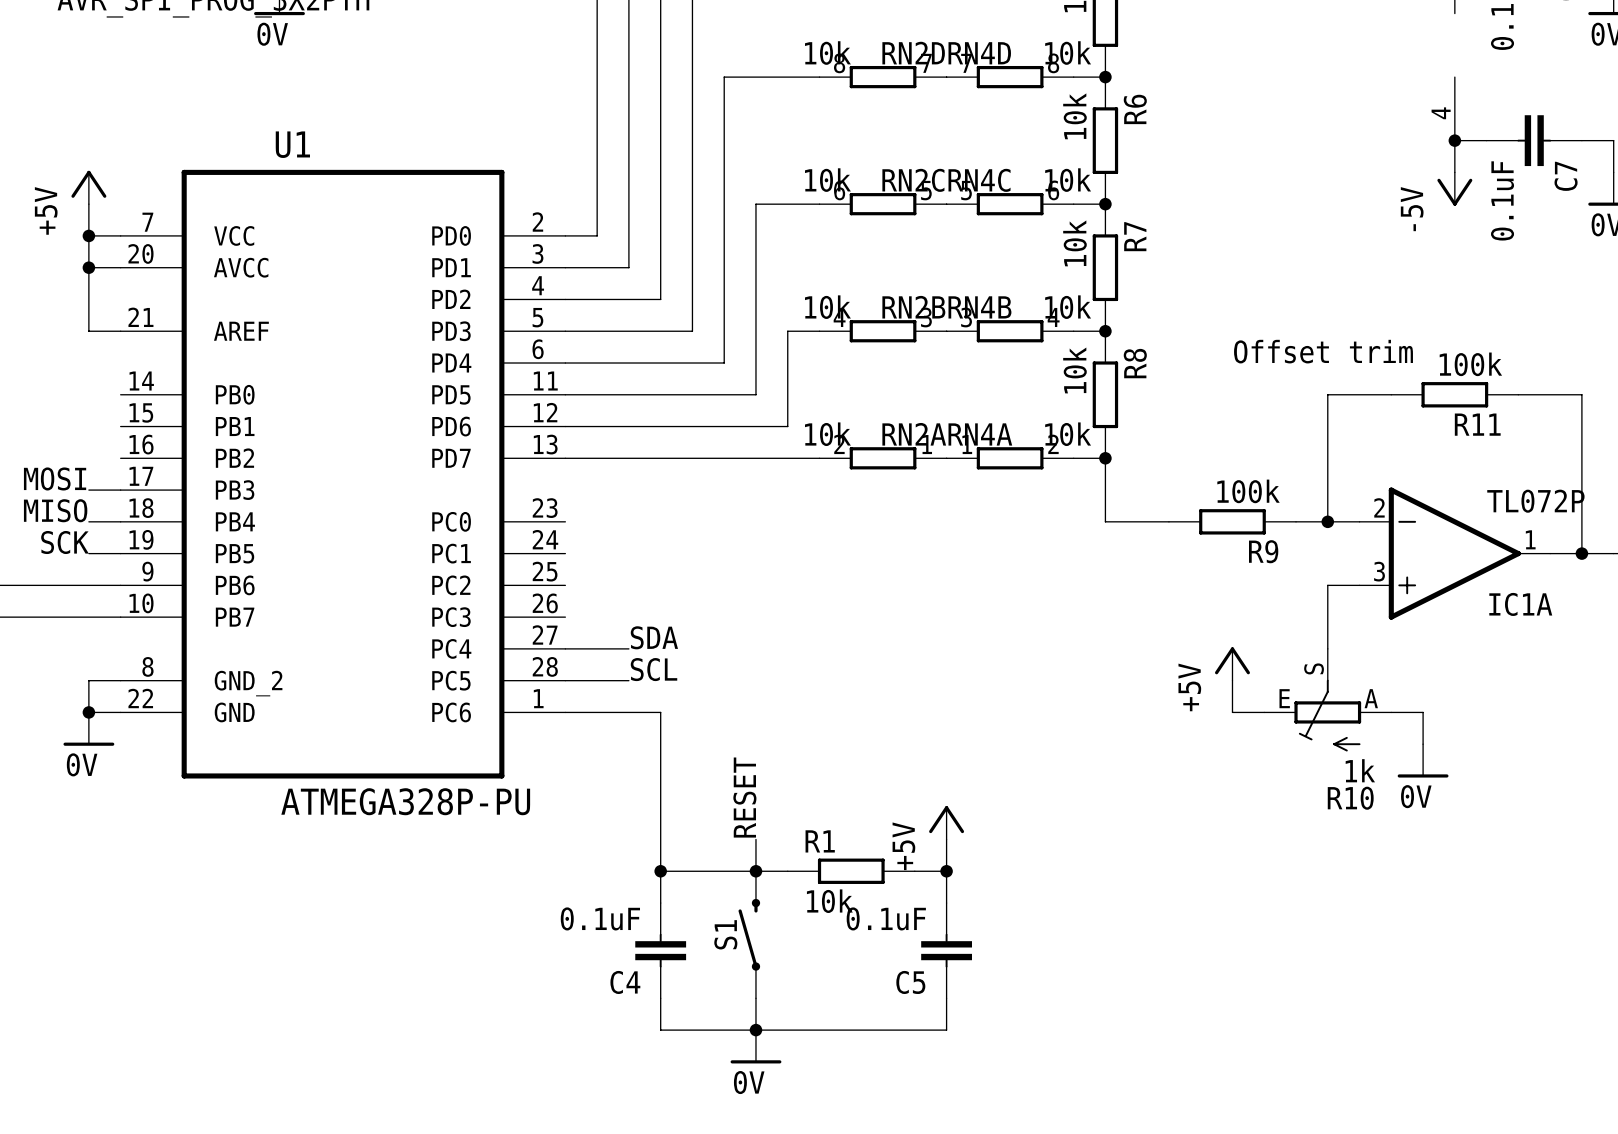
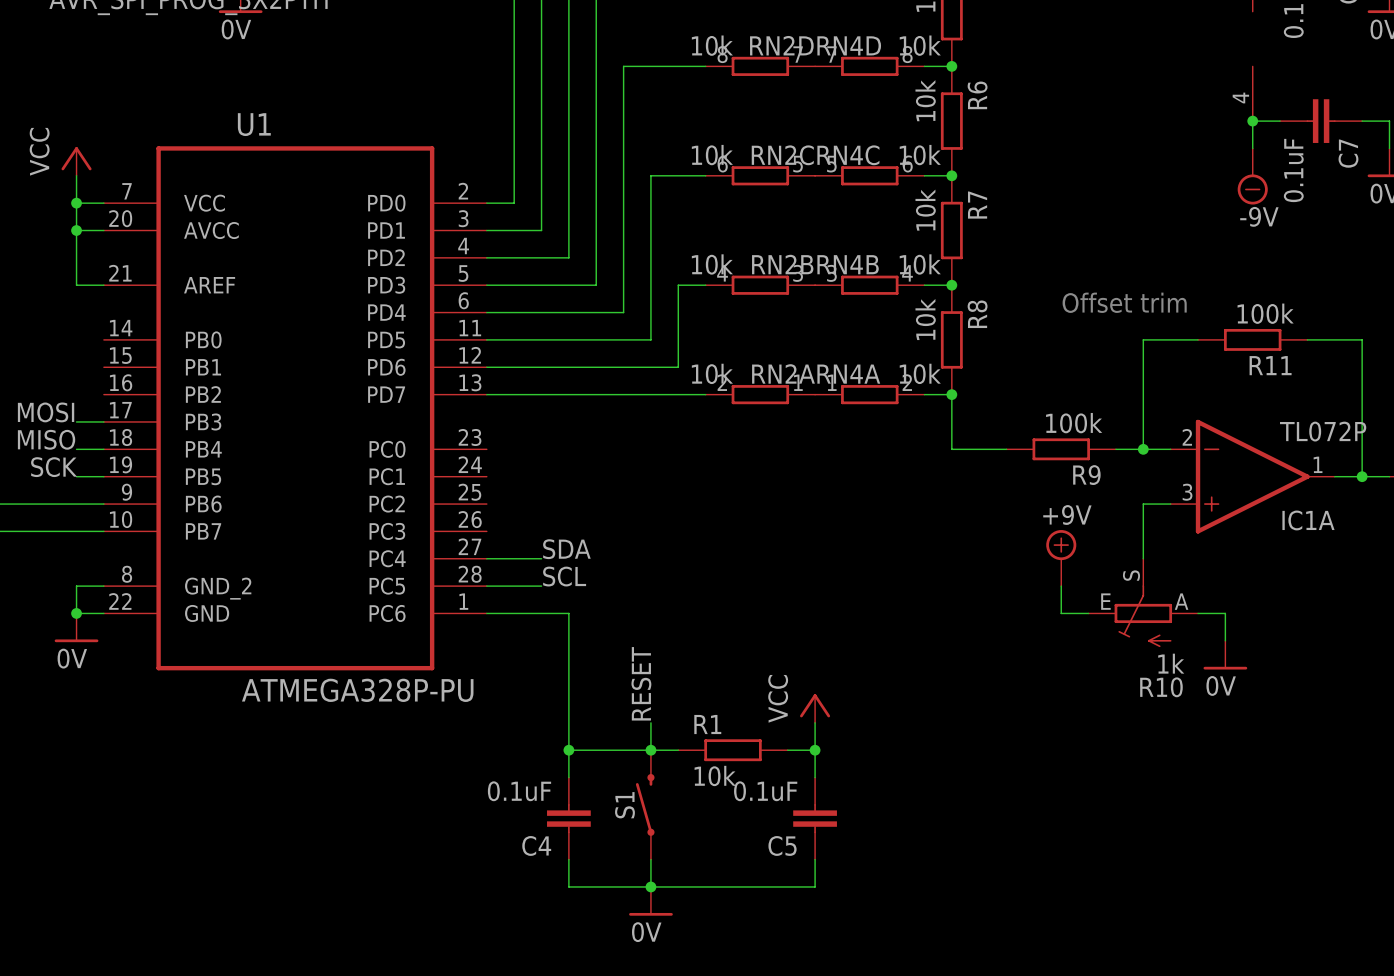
power symbol: +5V (88, 187) -> VCC (76, 161)
power symbol: -5V (1454, 189) -> none
power symbol: none -> -9V (1252, 176)
power symbol: none -> +9V (1061, 558)
power symbol: +5V (1232, 663) -> none
power symbol: +5V (946, 822) -> VCC (815, 708)

